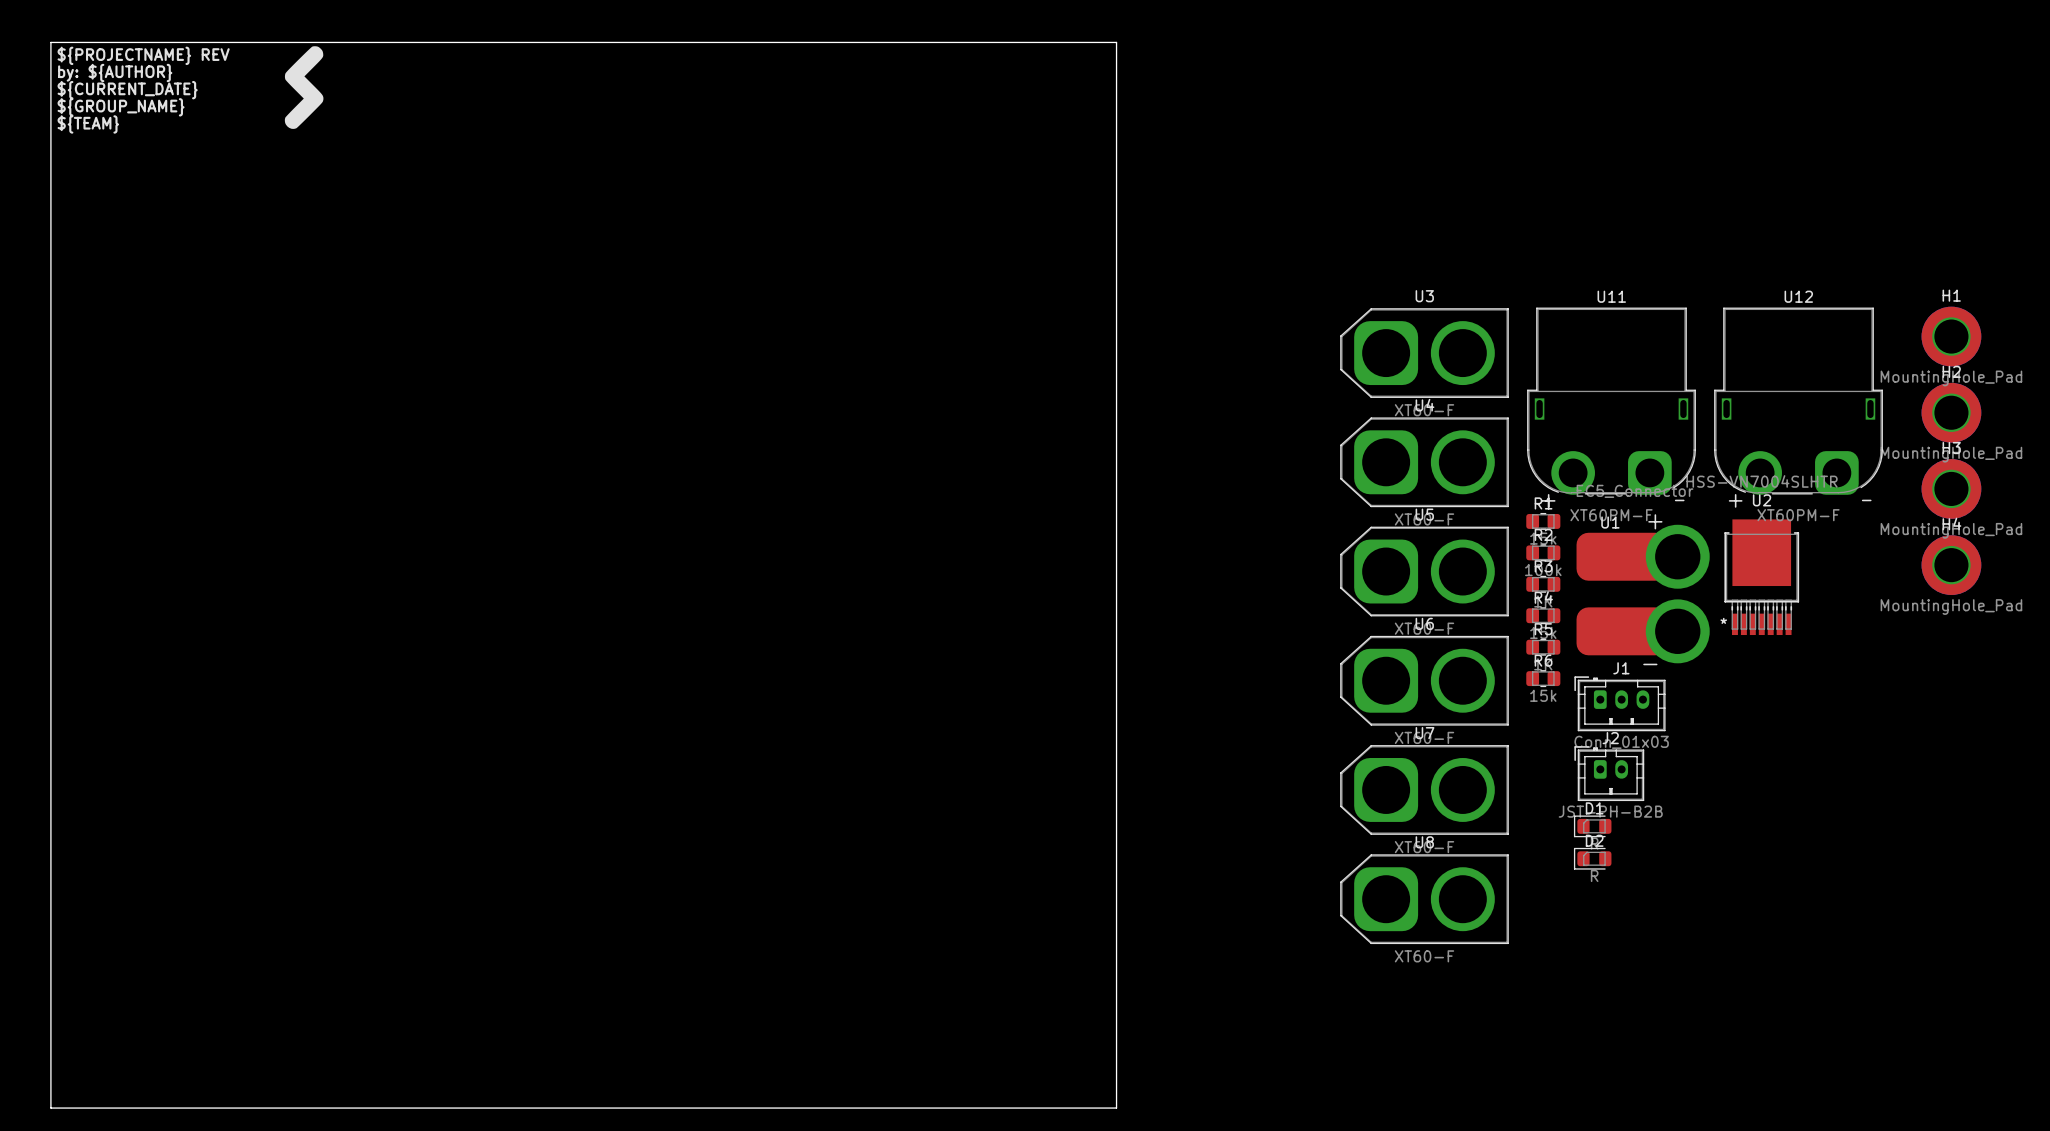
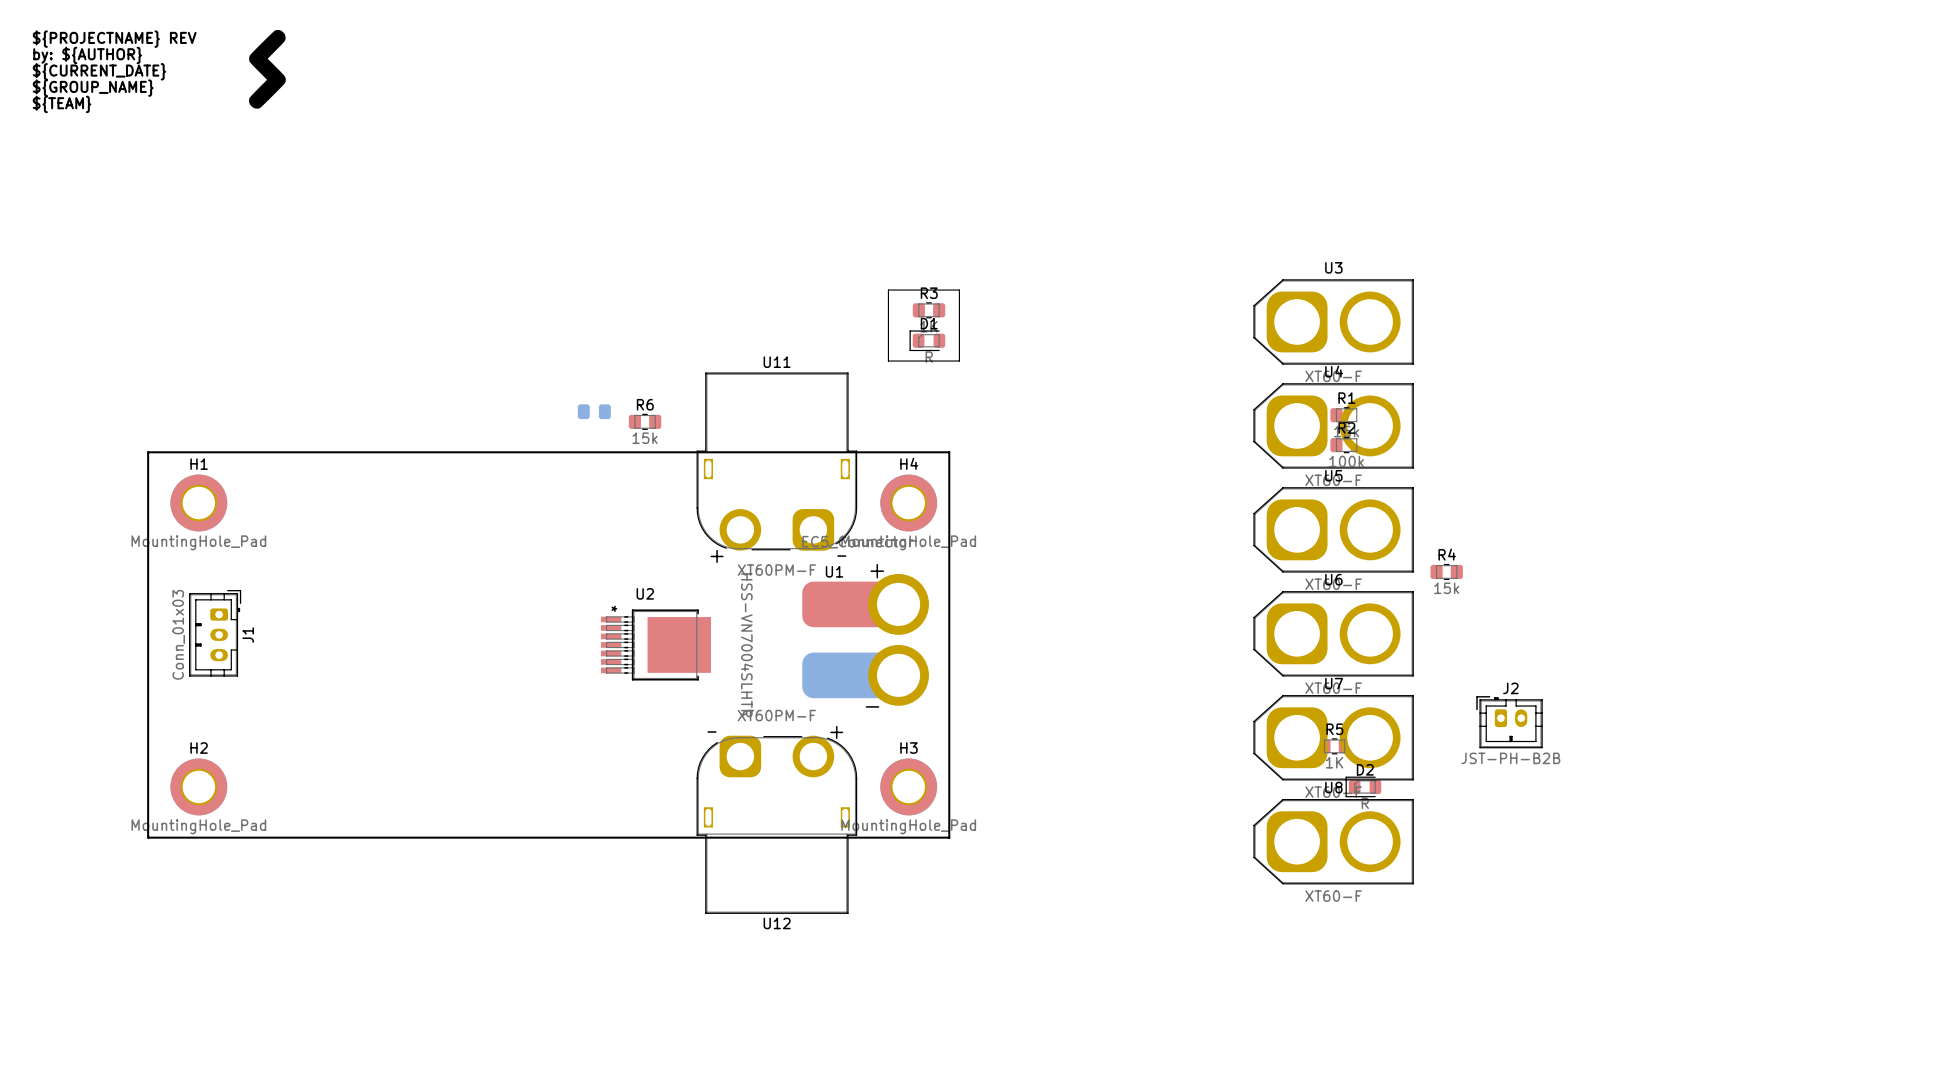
board edge: (50, 42) (1116, 42) (1116, 1108) (50, 1108) (50, 42) -> none
line: none -> (888, 290) (888, 361) (959, 361) (959, 290) (888, 290)
H1 position: (1951, 336) -> (198, 503)
U11 position: (1611, 401) -> (776, 461)
U12 rotation: 0° (1798, 401) -> 180° (776, 824)
U12 position: (1798, 401) -> (776, 824)
H2 position: (1951, 412) -> (198, 786)
part: none -> (594, 411)
H3 position: (1951, 488) -> (908, 786)
board edge: none -> (148, 452) (949, 452) (949, 837) (148, 837) (148, 452)
U2 name position: U2 (1762, 500) -> U2 (645, 593)
U1 footprint: [1576, 514, 1710, 666] -> [802, 563, 929, 708]
R1 position: (1543, 521) -> (1346, 415)
R2 position: (1543, 552) -> (1346, 445)
H4 position: (1951, 565) -> (908, 503)
U2 rotation: 0° (1761, 577) -> 90° clockwise (655, 644)
U2 position: (1761, 577) -> (655, 644)
R3 position: (1543, 584) -> (928, 310)
R5 position: (1543, 647) -> (1334, 746)
R6 position: (1543, 678) -> (645, 421)
J1 rotation: 0° (1620, 703) -> 90° clockwise (215, 633)
J1 position: (1620, 703) -> (215, 633)
D1 position: (1592, 826) -> (927, 340)
D2 position: (1592, 858) -> (1363, 786)

